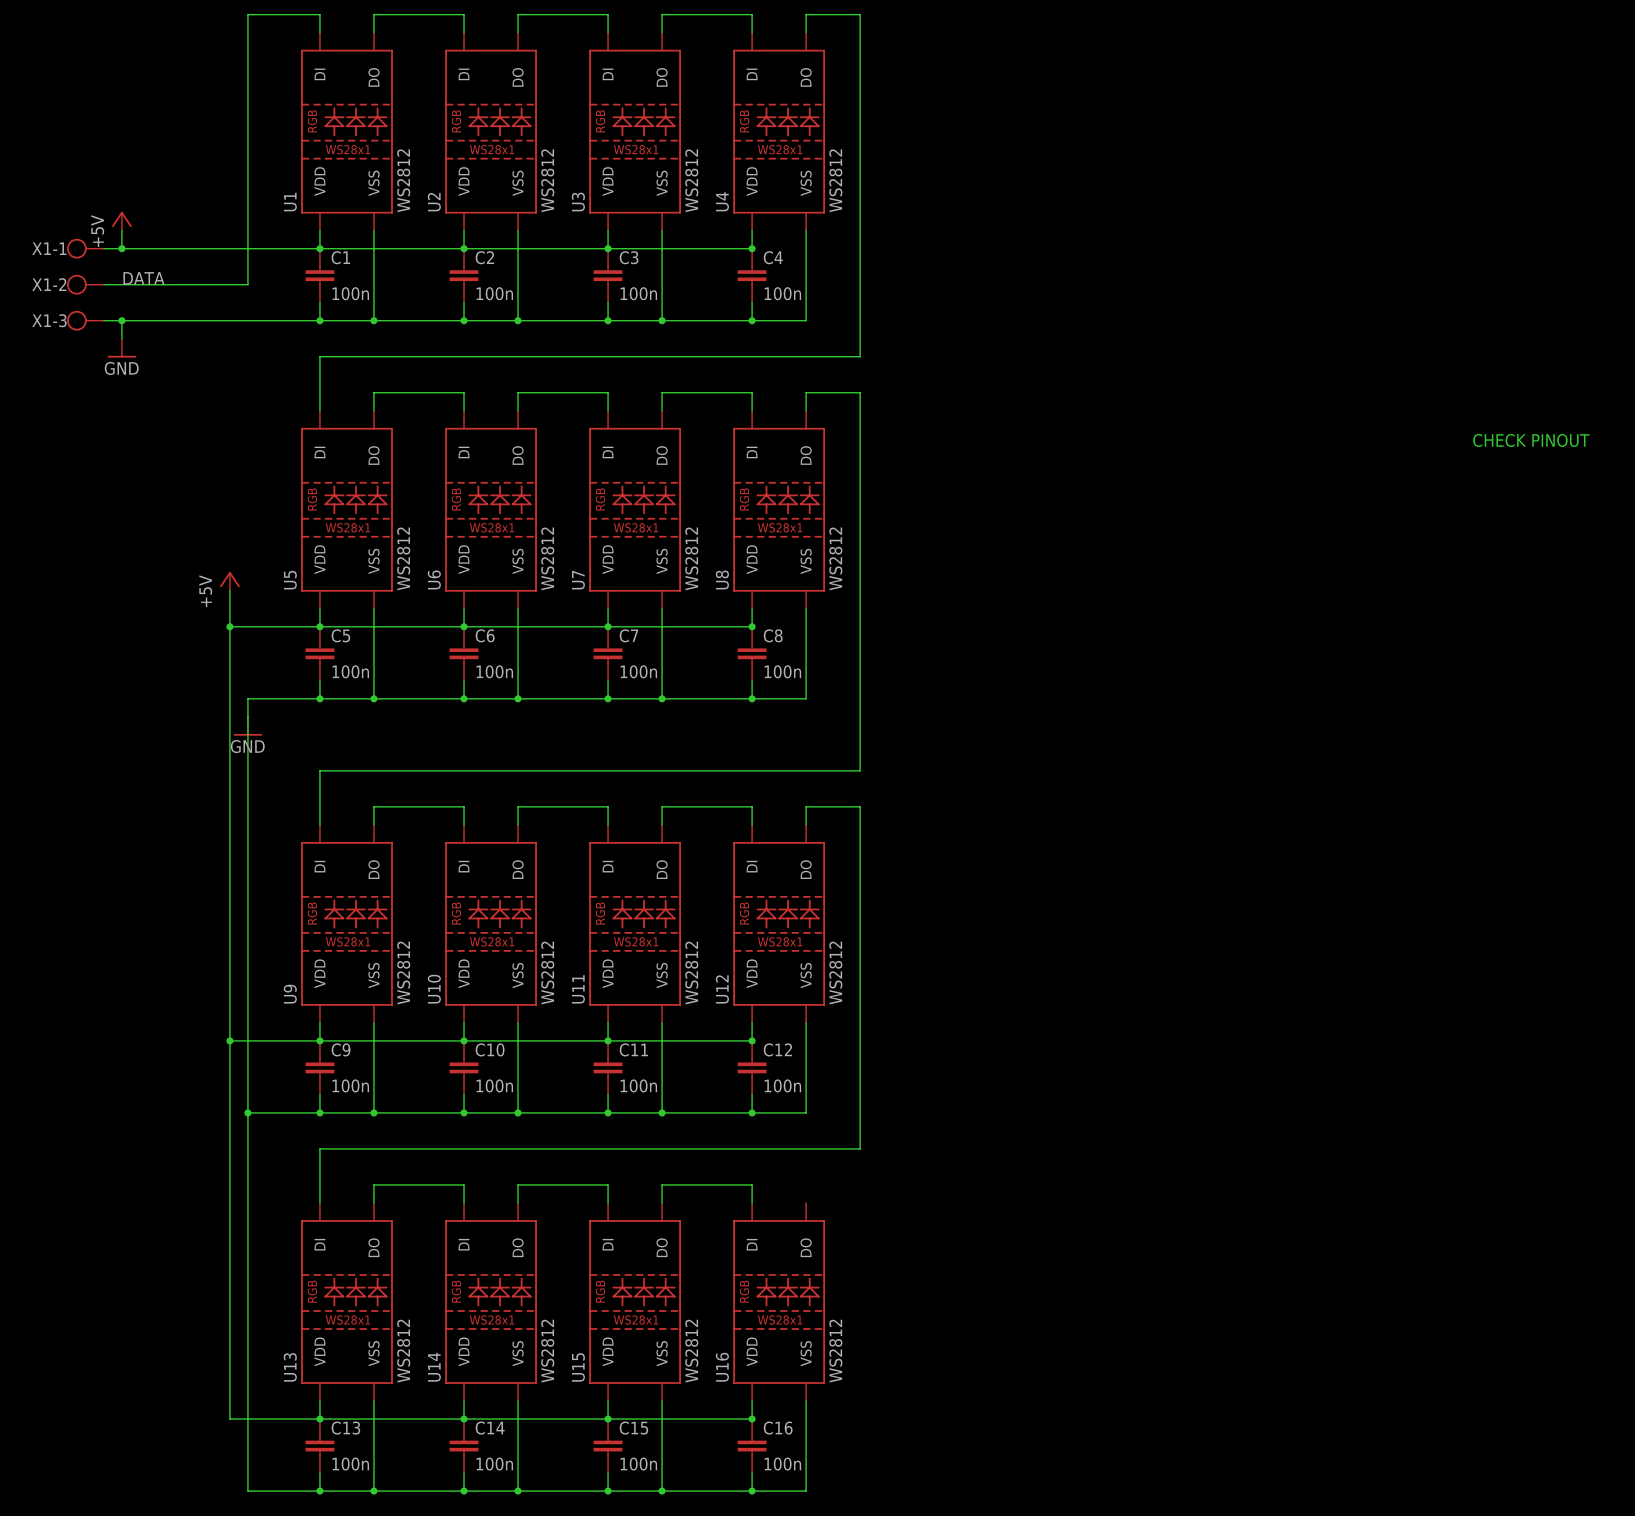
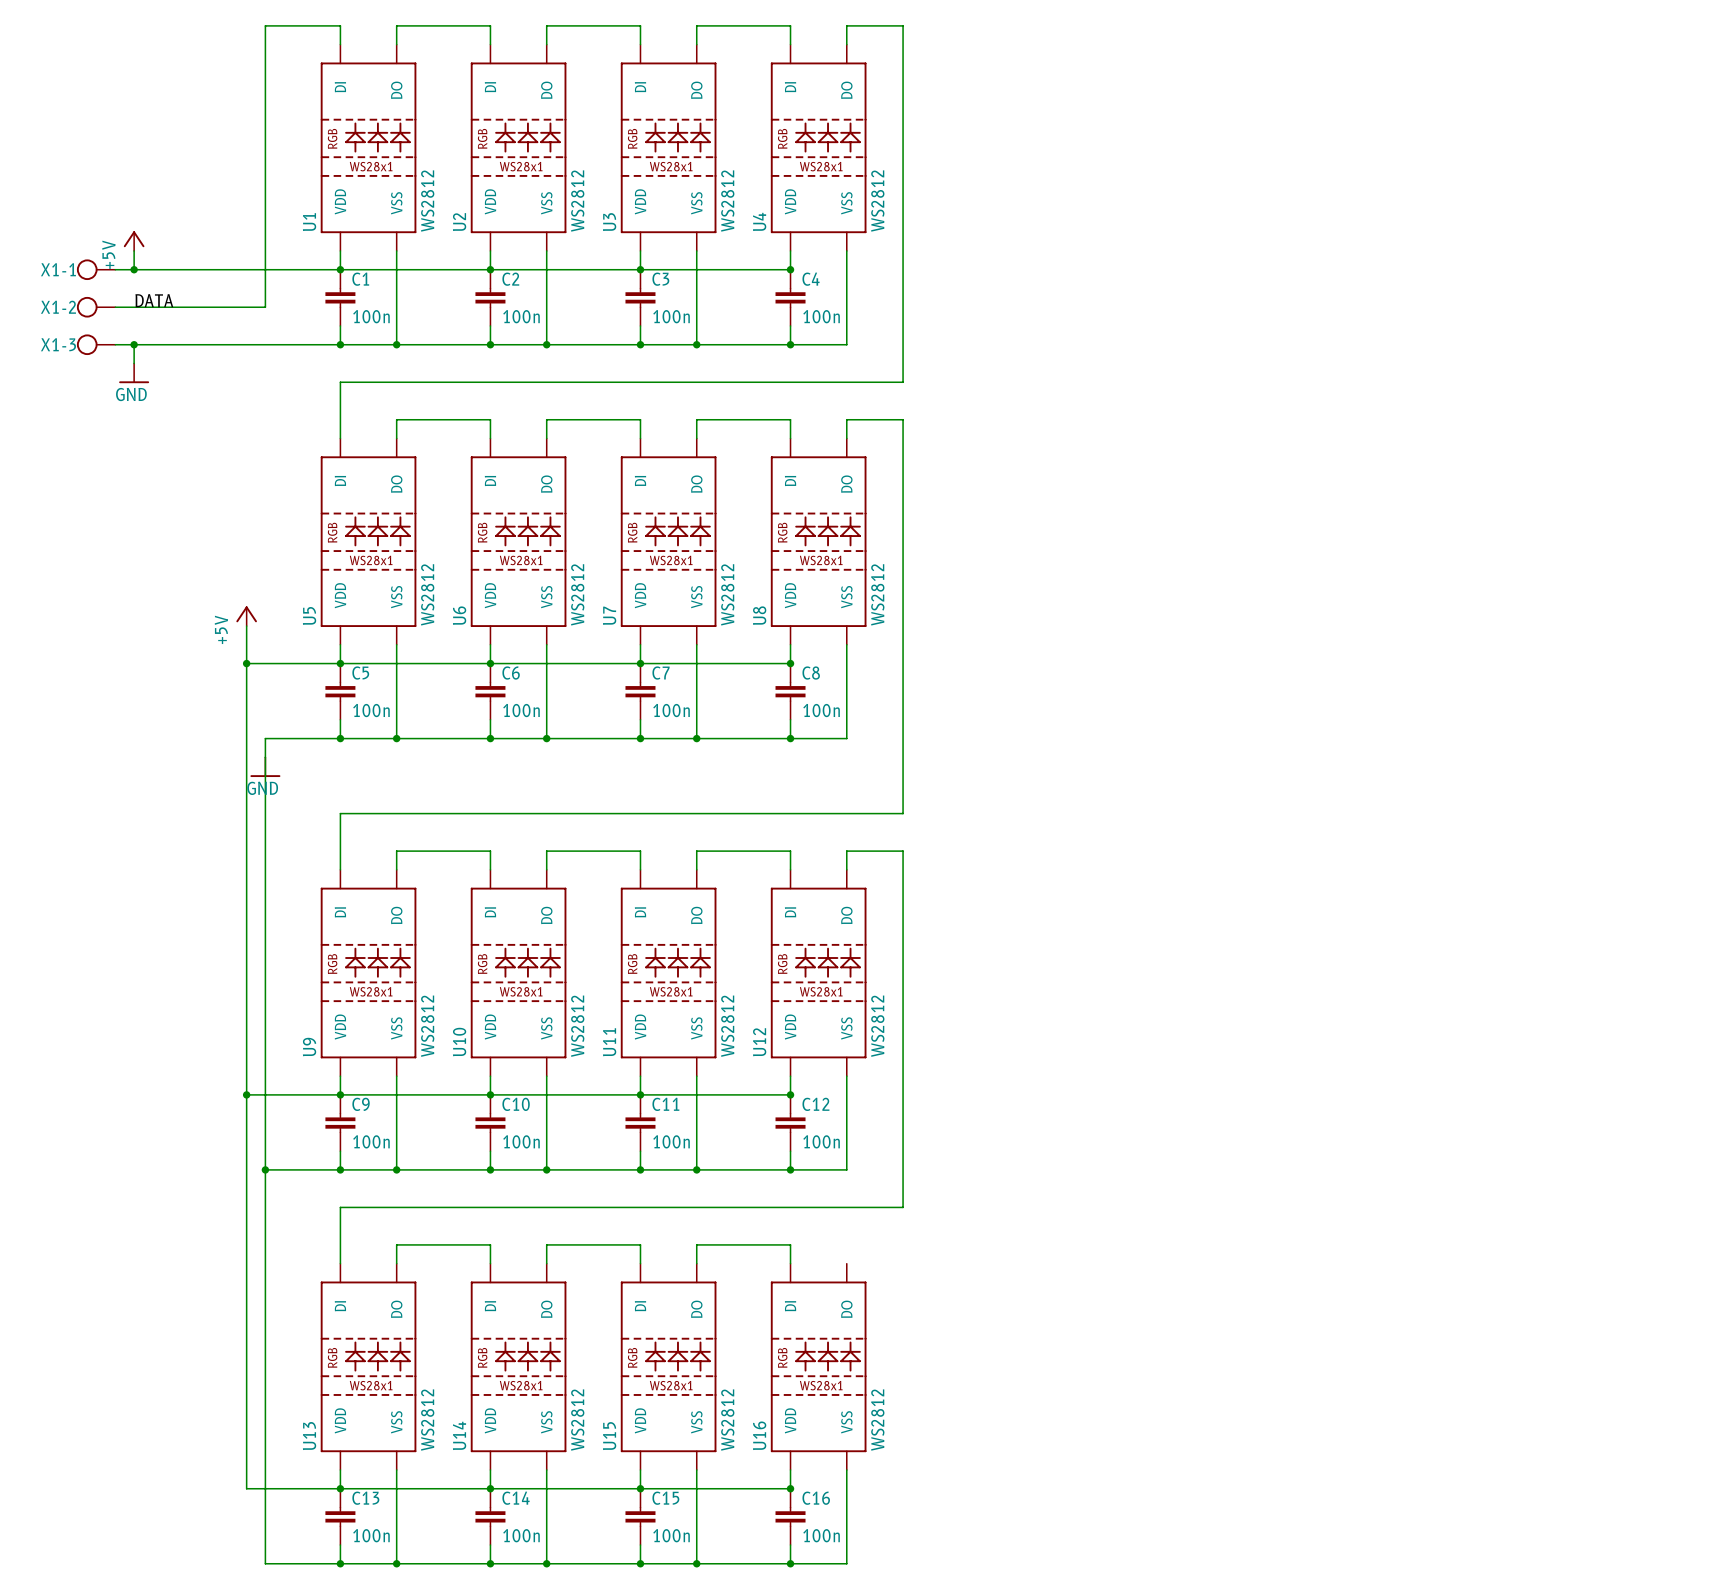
text: CHECK PINOUT (1531, 440) -> none

